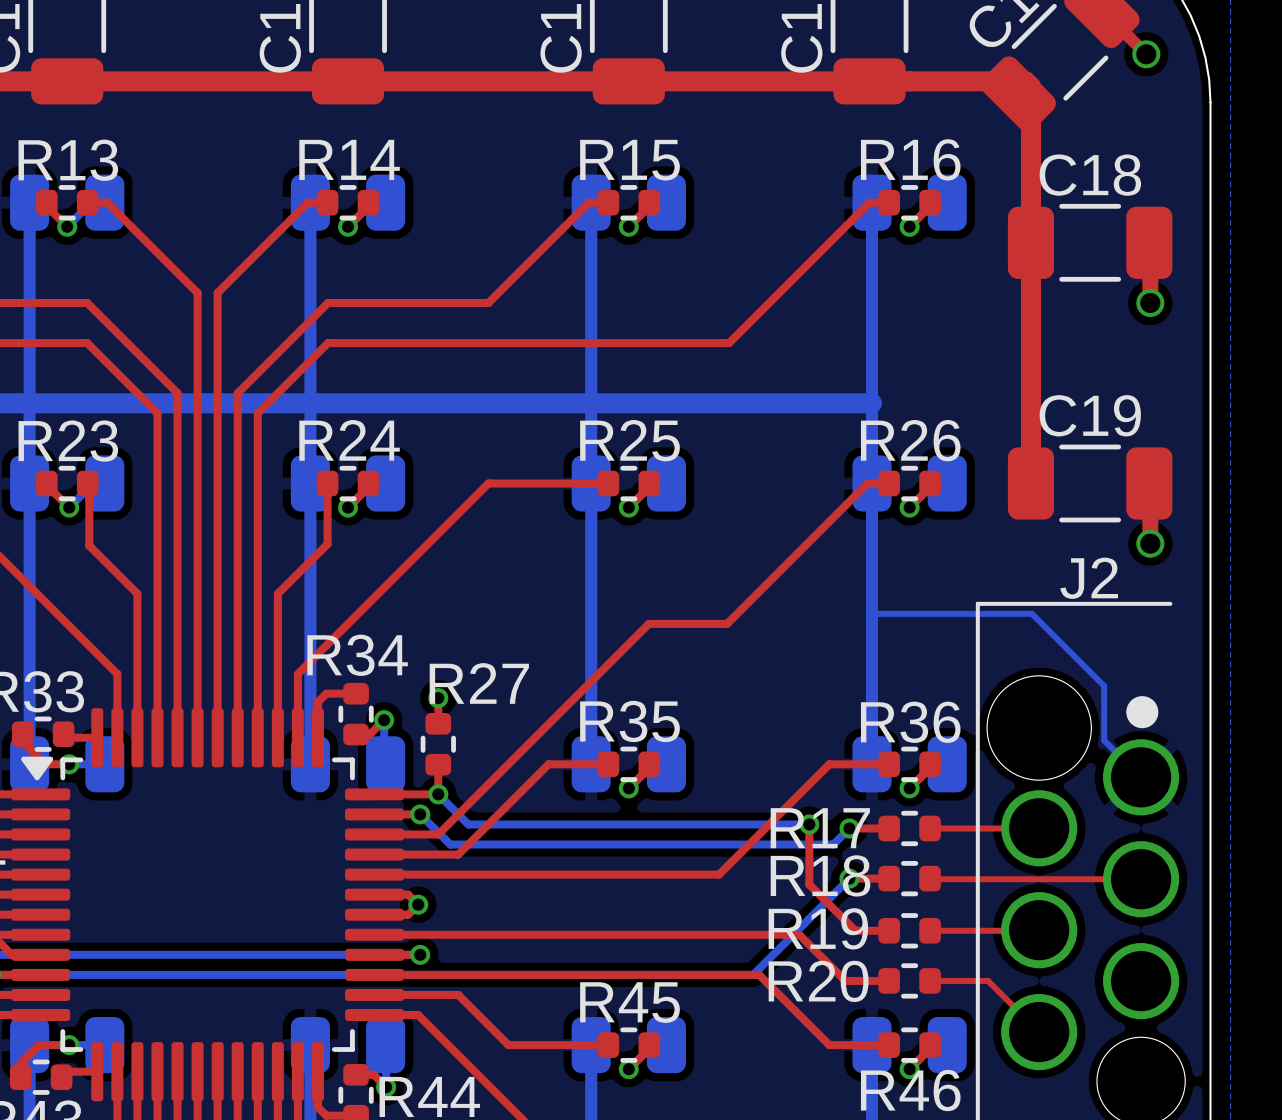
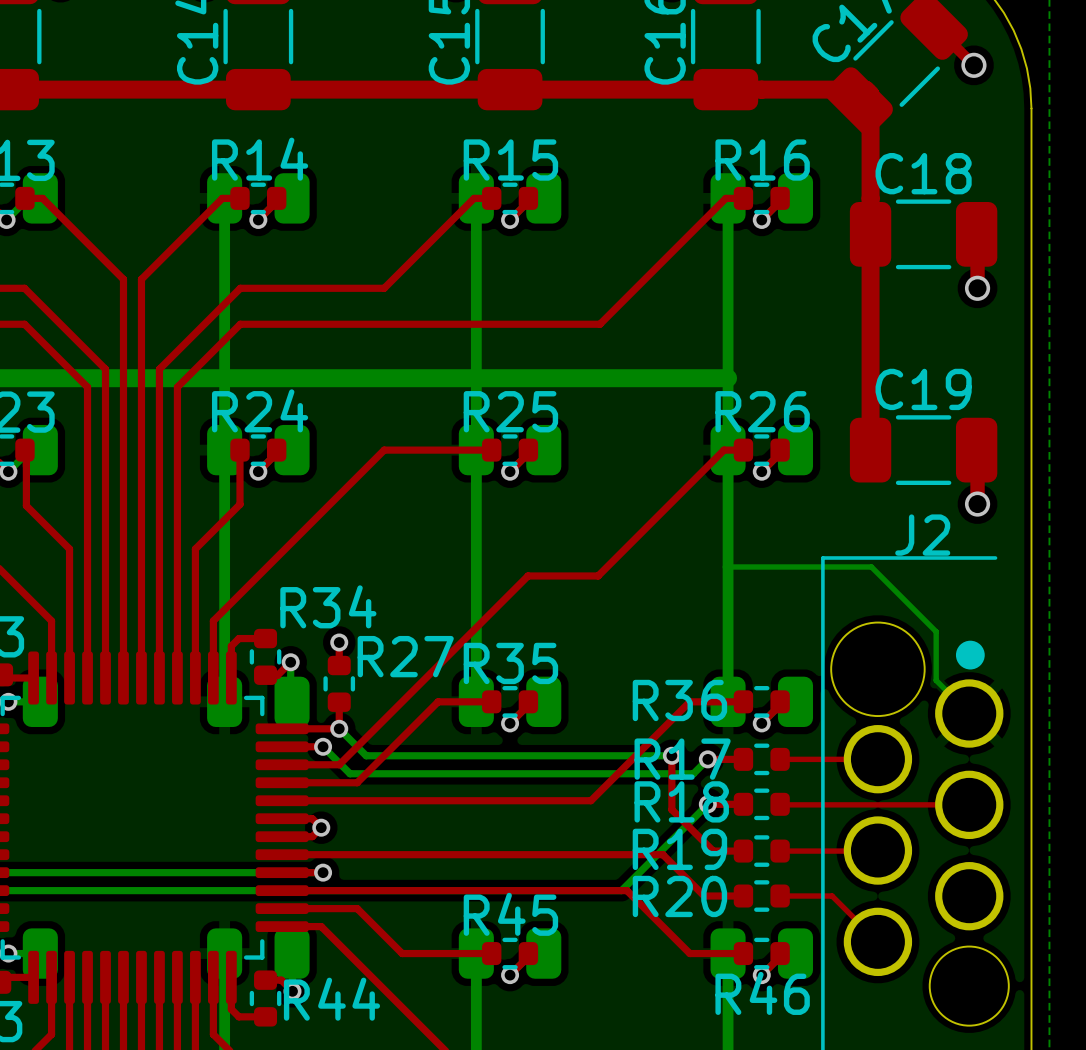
R34 name position: R34 (357, 655) -> R34 (328, 606)
R27 name position: R27 (479, 683) -> R27 (405, 656)
R36 name position: R36 (910, 722) -> R36 (679, 700)

